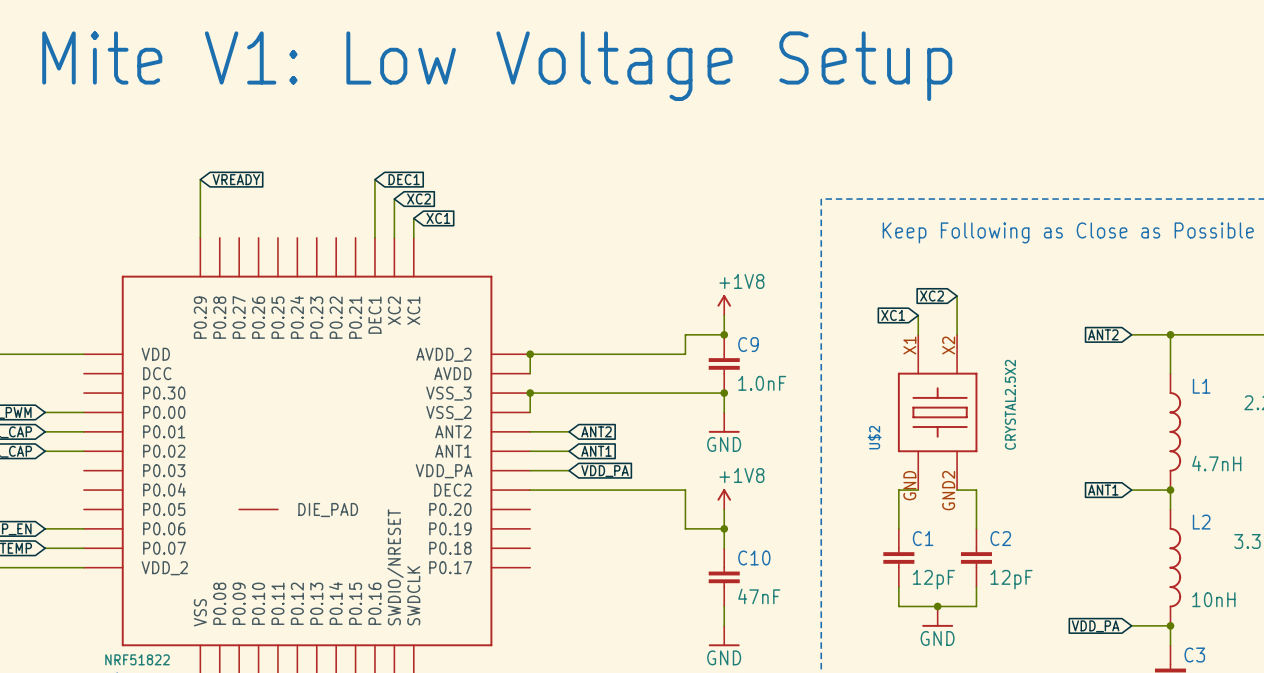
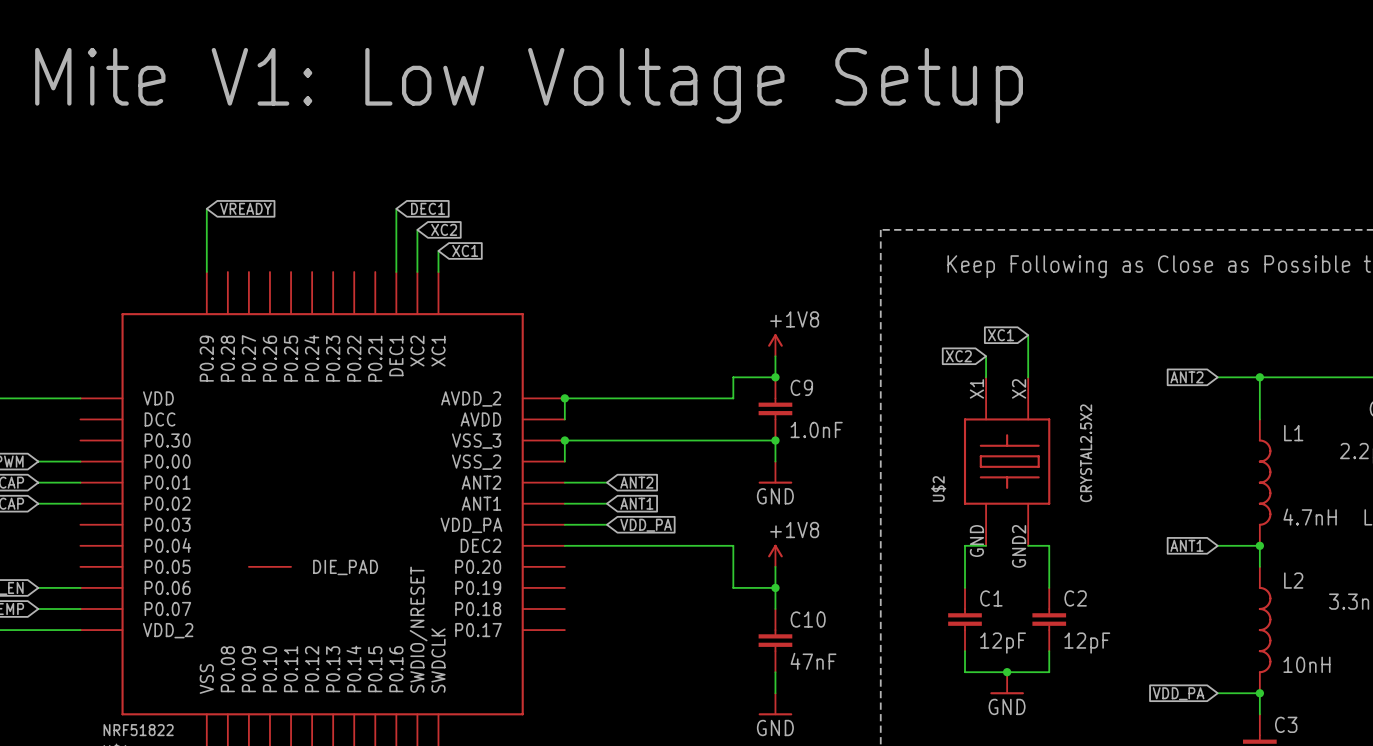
global label: XC2 (932, 296) -> XC1 (1001, 335)
global label: XC1 (893, 315) -> XC2 (958, 356)

